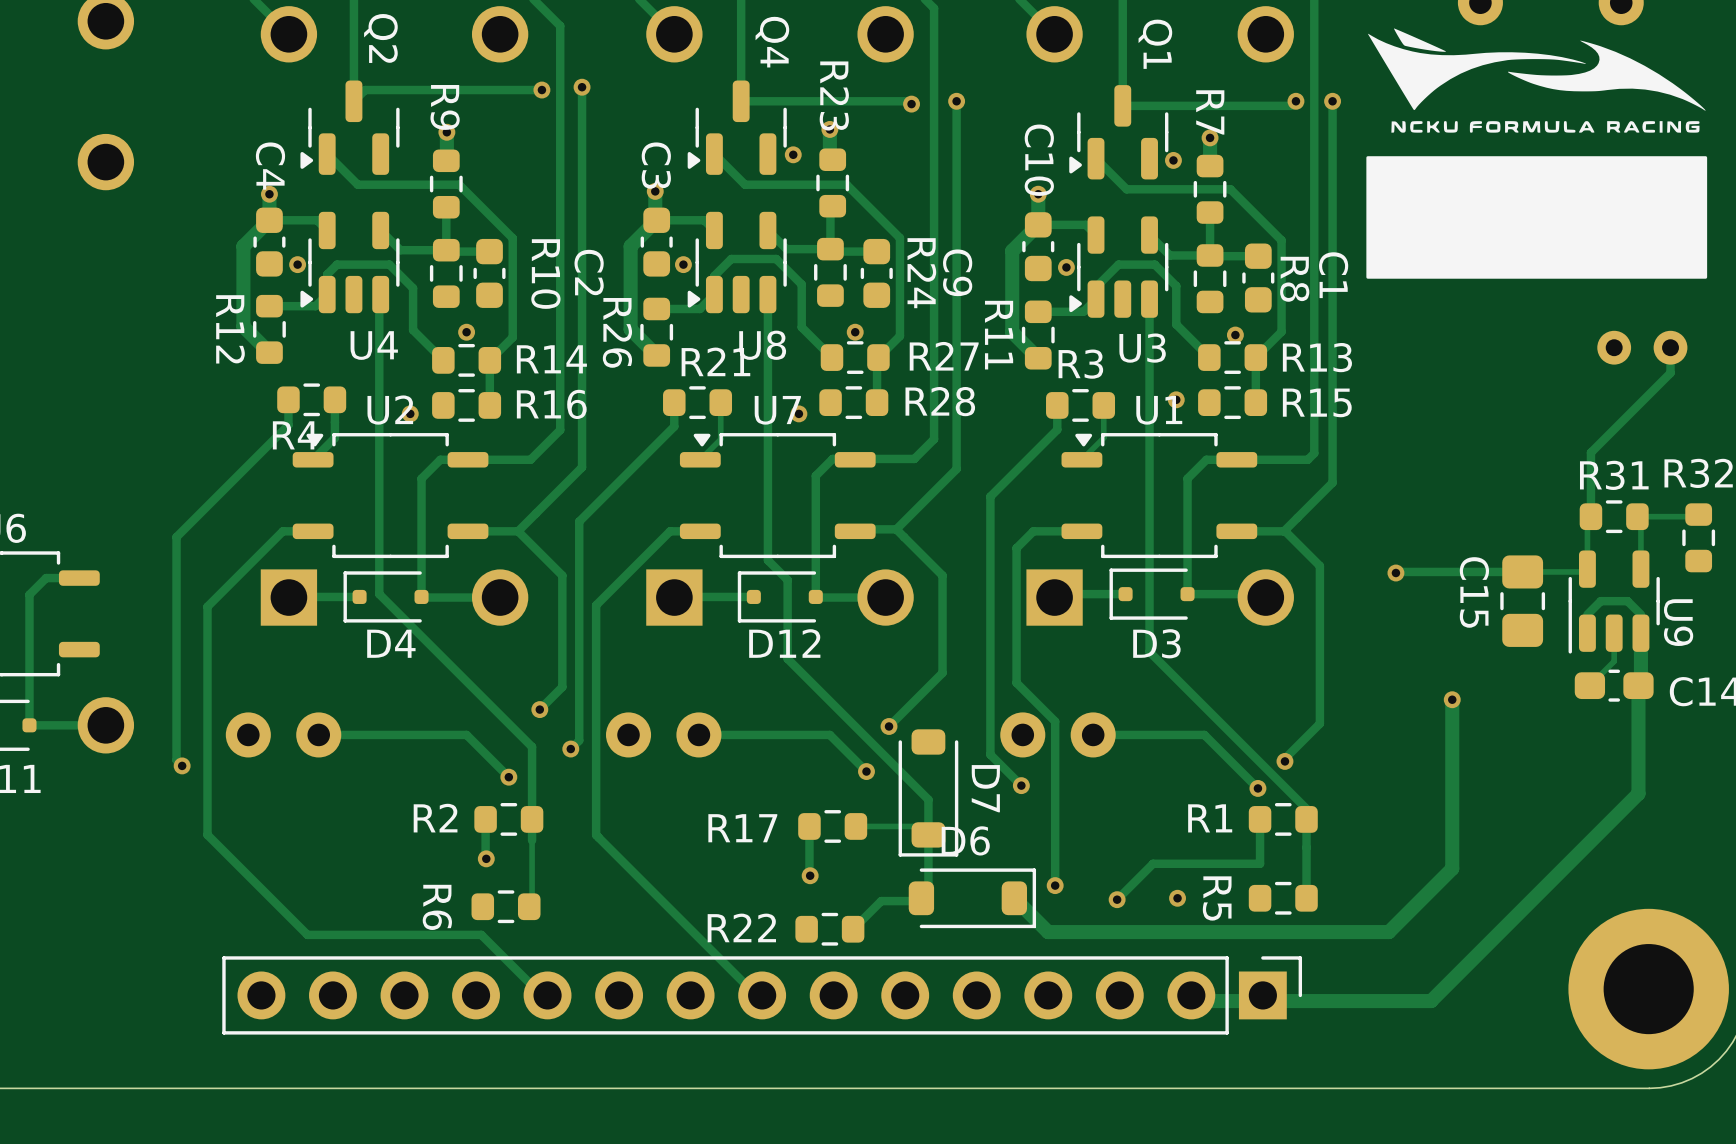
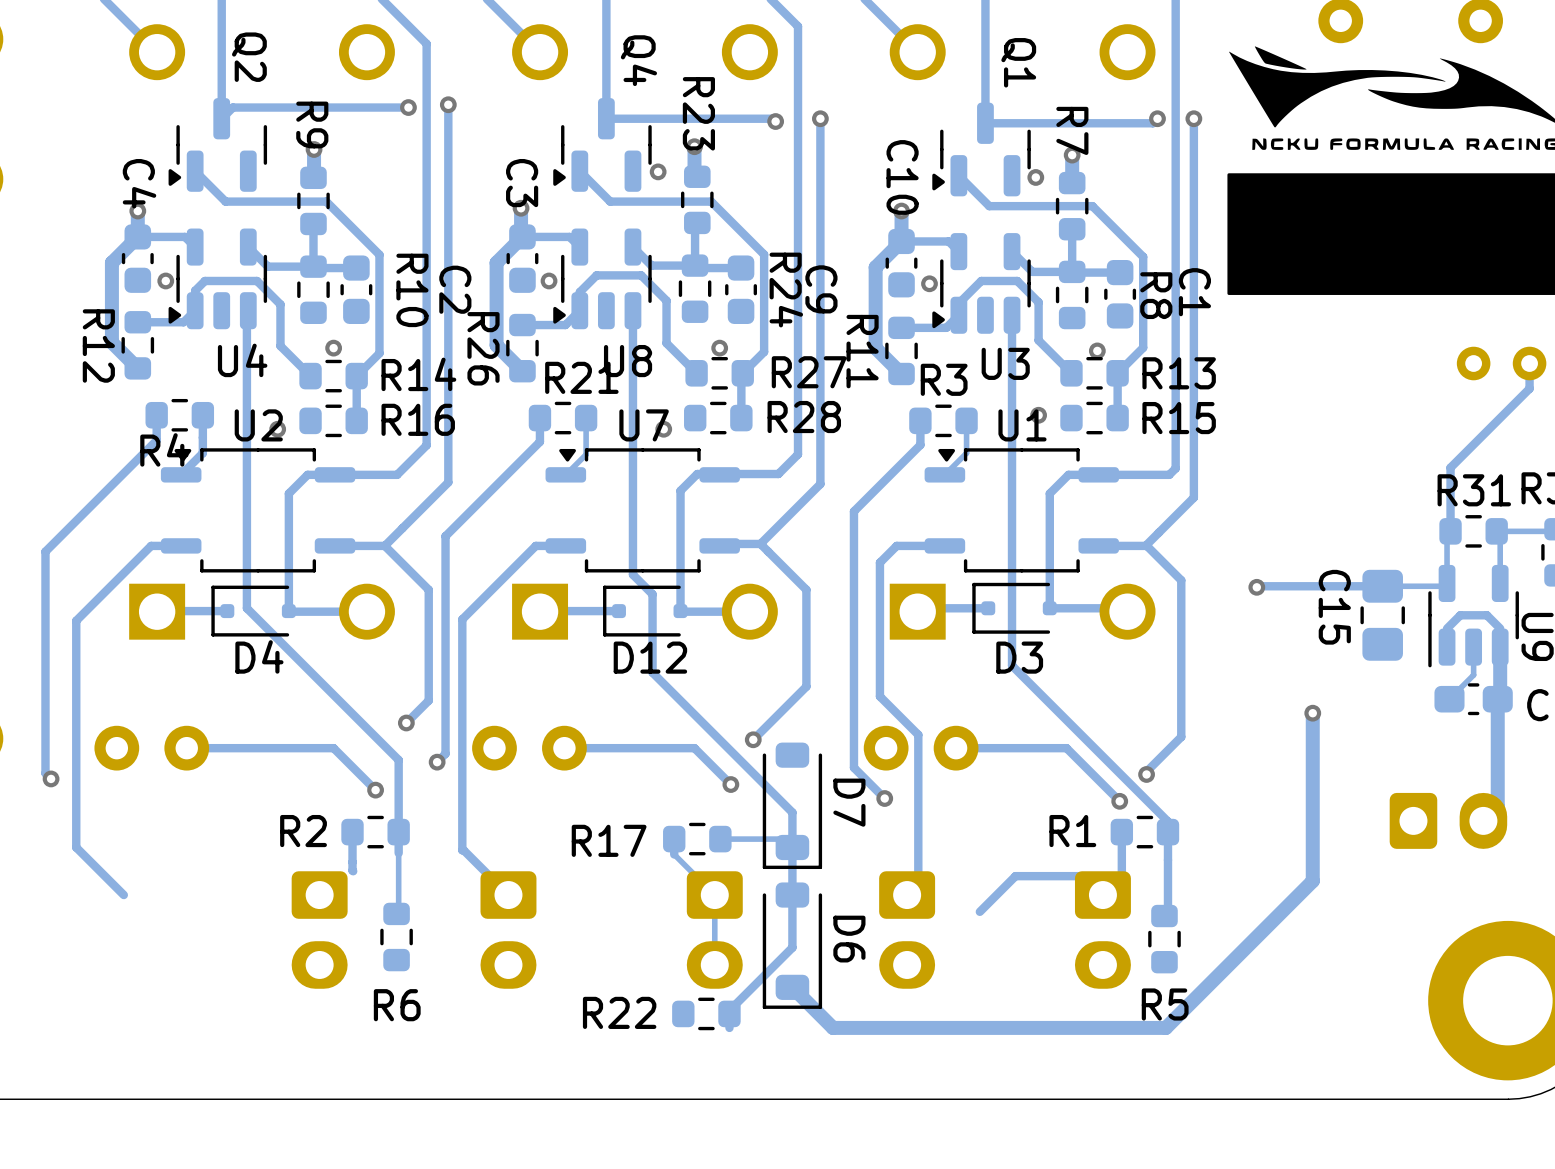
part: none -> (1448, 820)
track: (1624, 808) (1431, 1001) (1191, 1001) -> none
track: (596, 835) (762, 1001) -> (462, 847) (462, 850) (508, 895)
track: (809, 841) (810, 875) -> (674, 854) (714, 895) (714, 950)
via: (486, 858) -> none
via: (810, 875) -> none
track: (255, 882) (307, 934) (481, 934) (547, 1001) -> none
via: (1055, 885) -> none
D6 rotation: 0° (972, 898) -> 90° clockwise (792, 945)
track: (1014, 898) (1048, 932) (1388, 932) -> (792, 987) (832, 1027) (1165, 1027) (1249, 943)
via: (1177, 898) -> none
R5 name position: R5 (1217, 898) -> R5 (1165, 1004)
R5 rotation: 0° (1283, 898) -> 90° clockwise (1164, 939)
via: (1117, 899) -> none
track: (928, 901) (881, 901) (853, 929) -> (792, 913) (792, 947) (729, 1010) (729, 1027)
R6 rotation: 0° (506, 906) -> 90° clockwise (396, 937)
R6 name position: R6 (437, 907) -> R6 (397, 1005)
part: none -> (319, 930)
part: none -> (508, 930)
part: none -> (714, 930)
part: none -> (907, 930)
part: none -> (1102, 930)
R22 position: (829, 929) -> (706, 1013)
part: (762, 995) -> none

